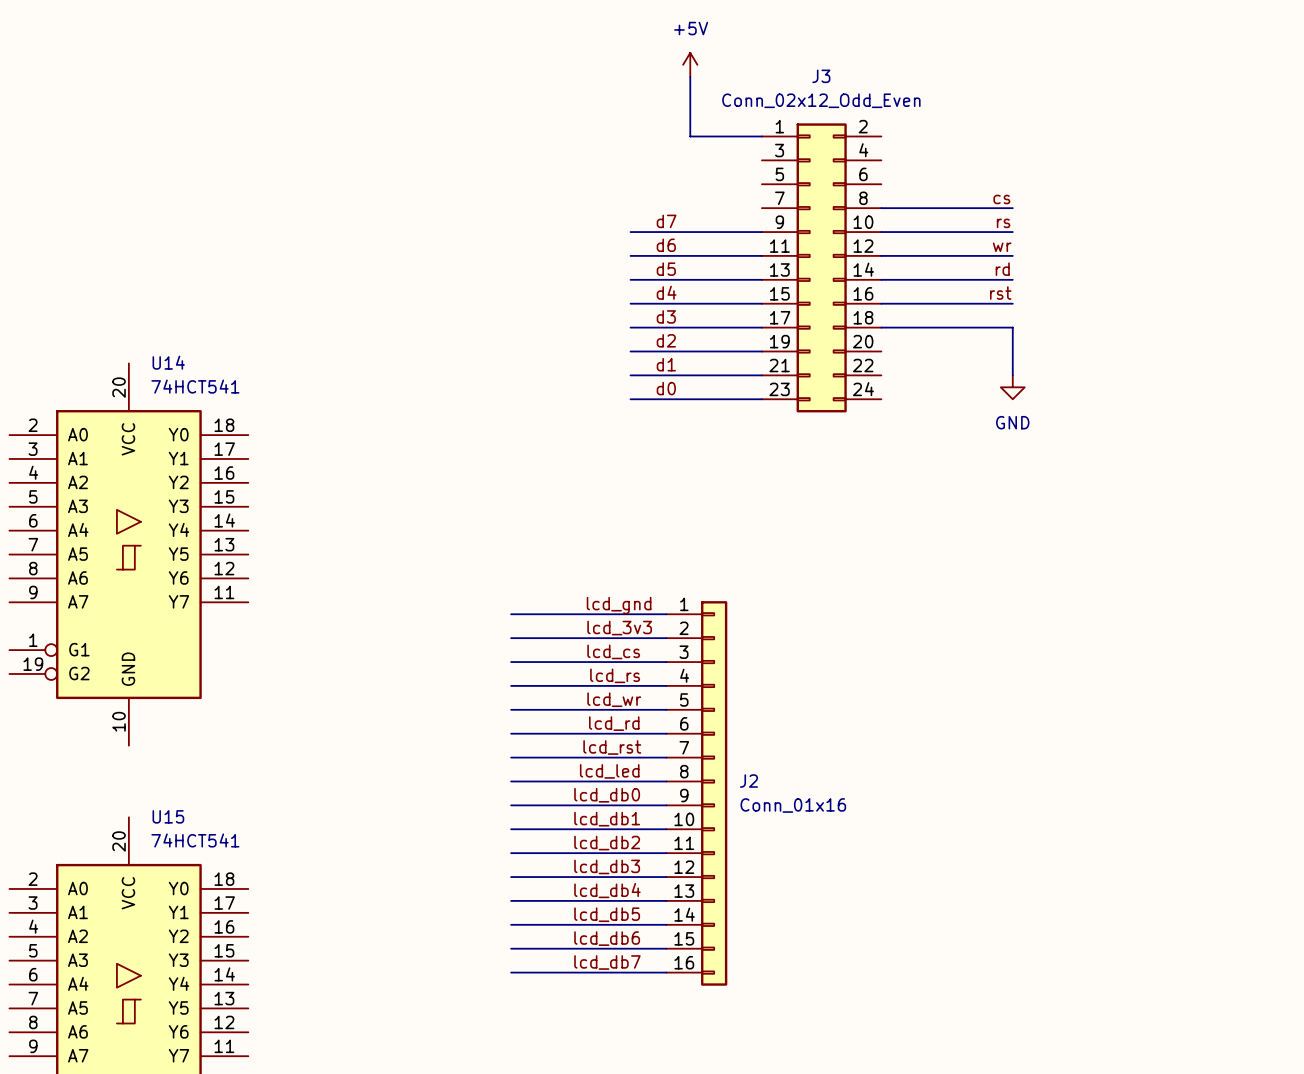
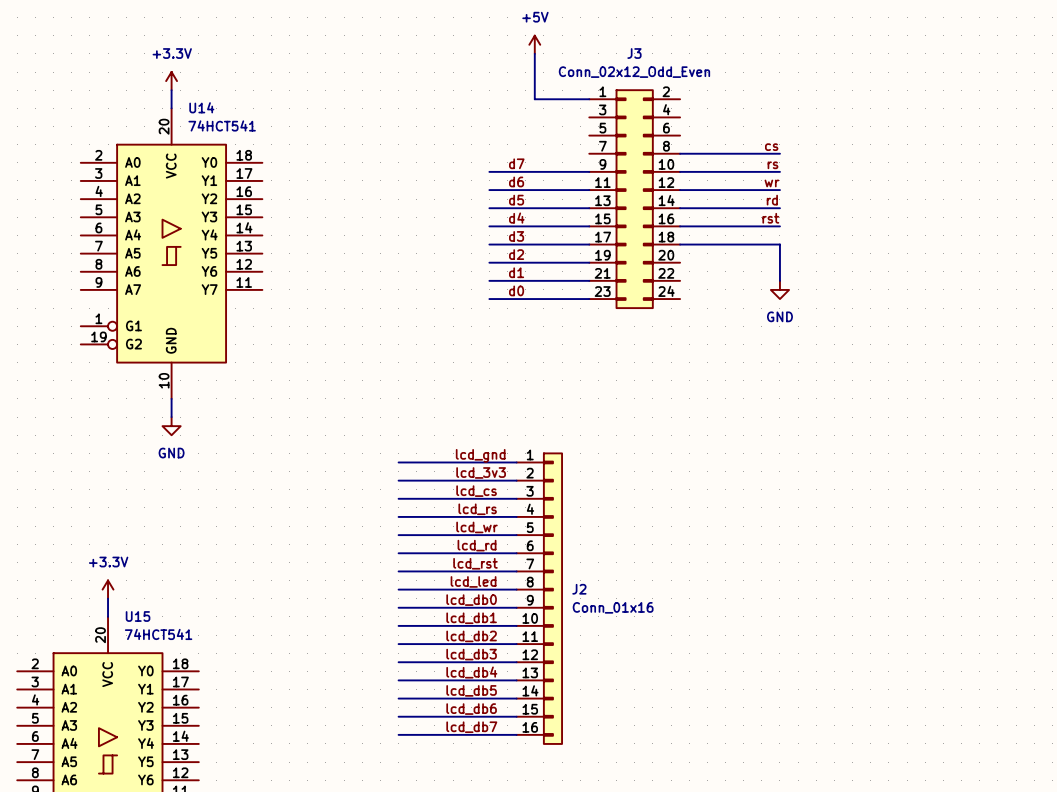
power symbol: none -> +3.3V (171, 81)
wire: none -> (171, 90) (171, 108)
wire: none -> (171, 398) (171, 417)
U14 position: (128, 554) -> (171, 253)
power symbol: none -> GND (171, 426)
power symbol: none -> +3.3V (108, 589)
wire: none -> (108, 598) (108, 616)

